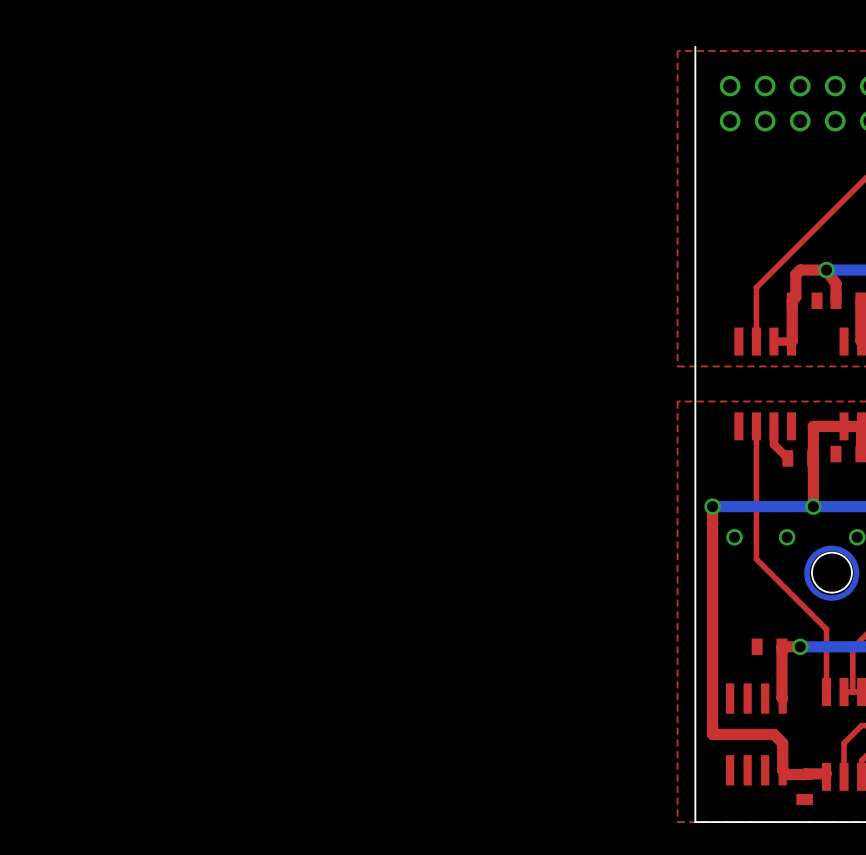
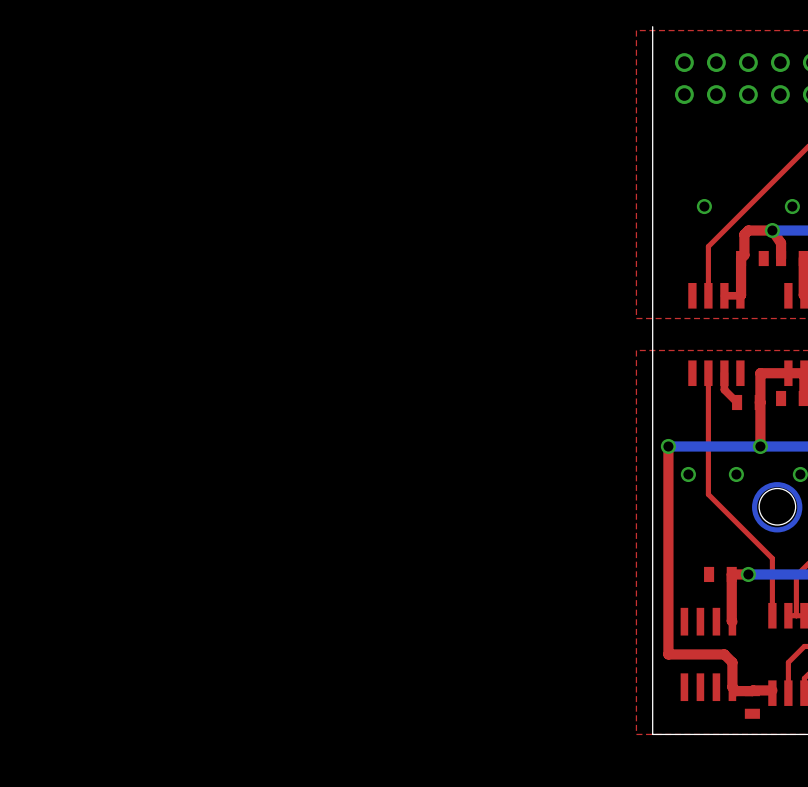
via: none -> (704, 206)
via: none -> (792, 206)

